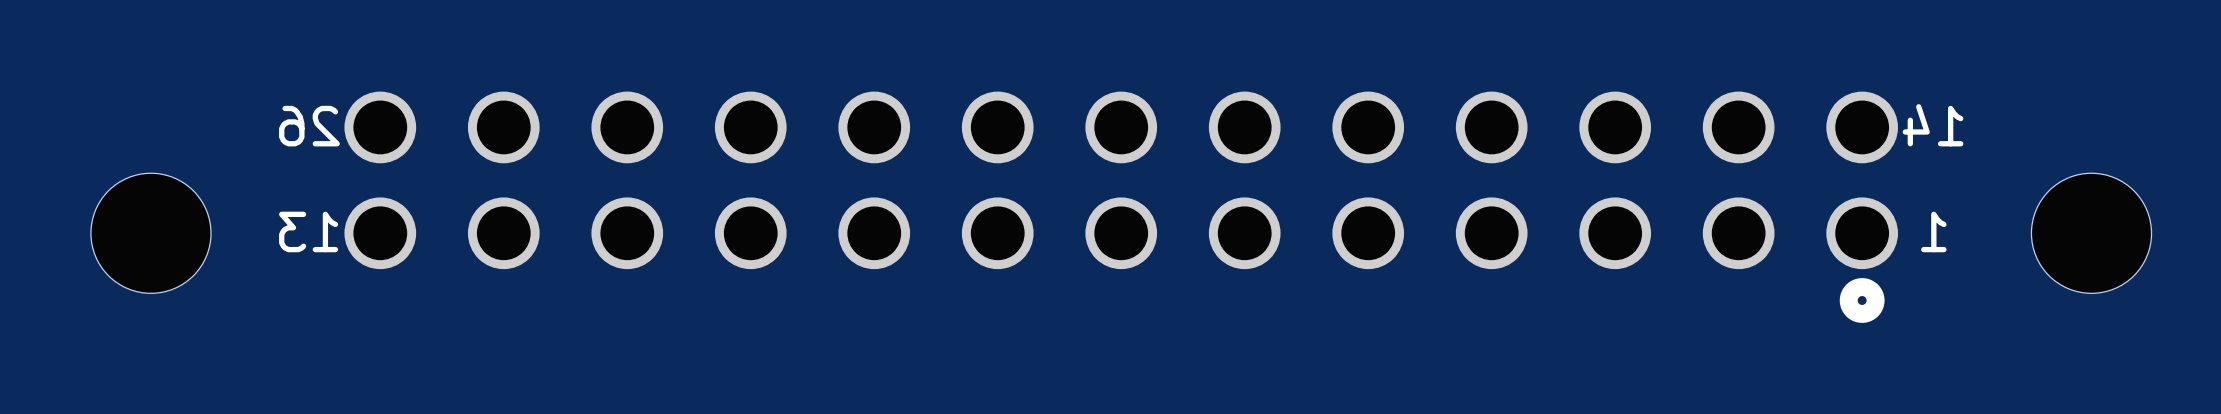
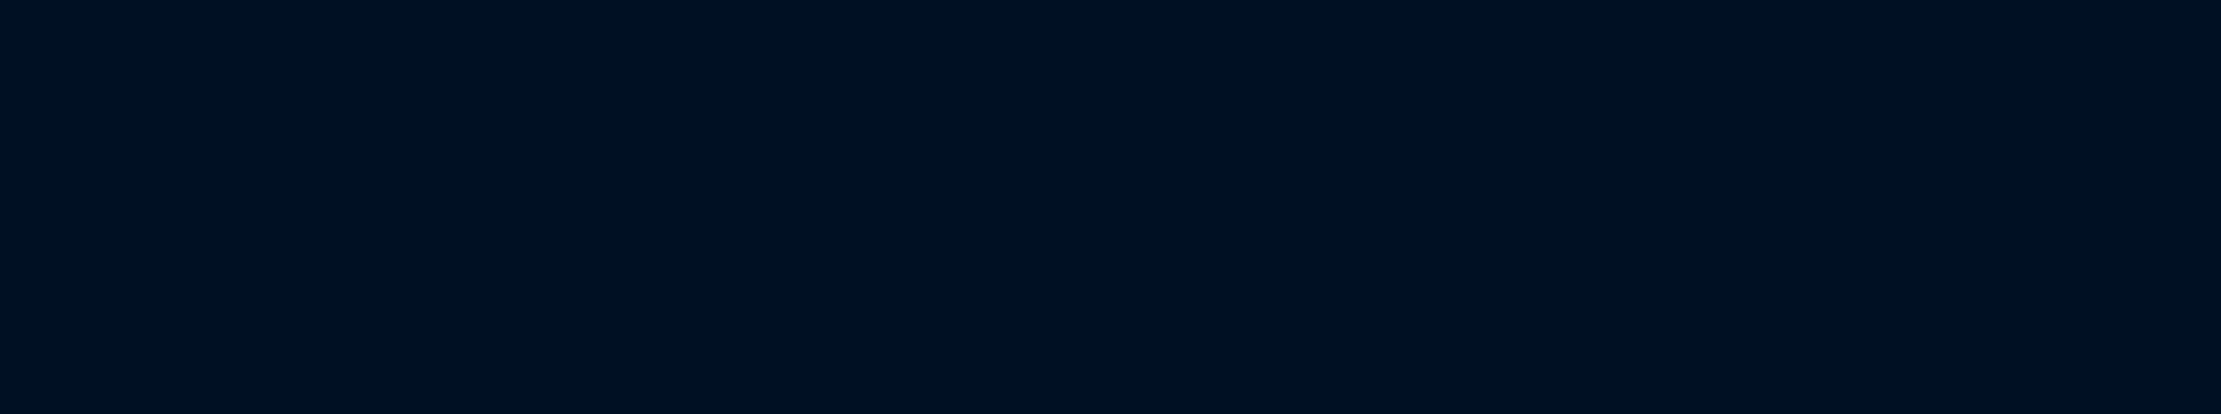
part: (1121, 207) -> none

